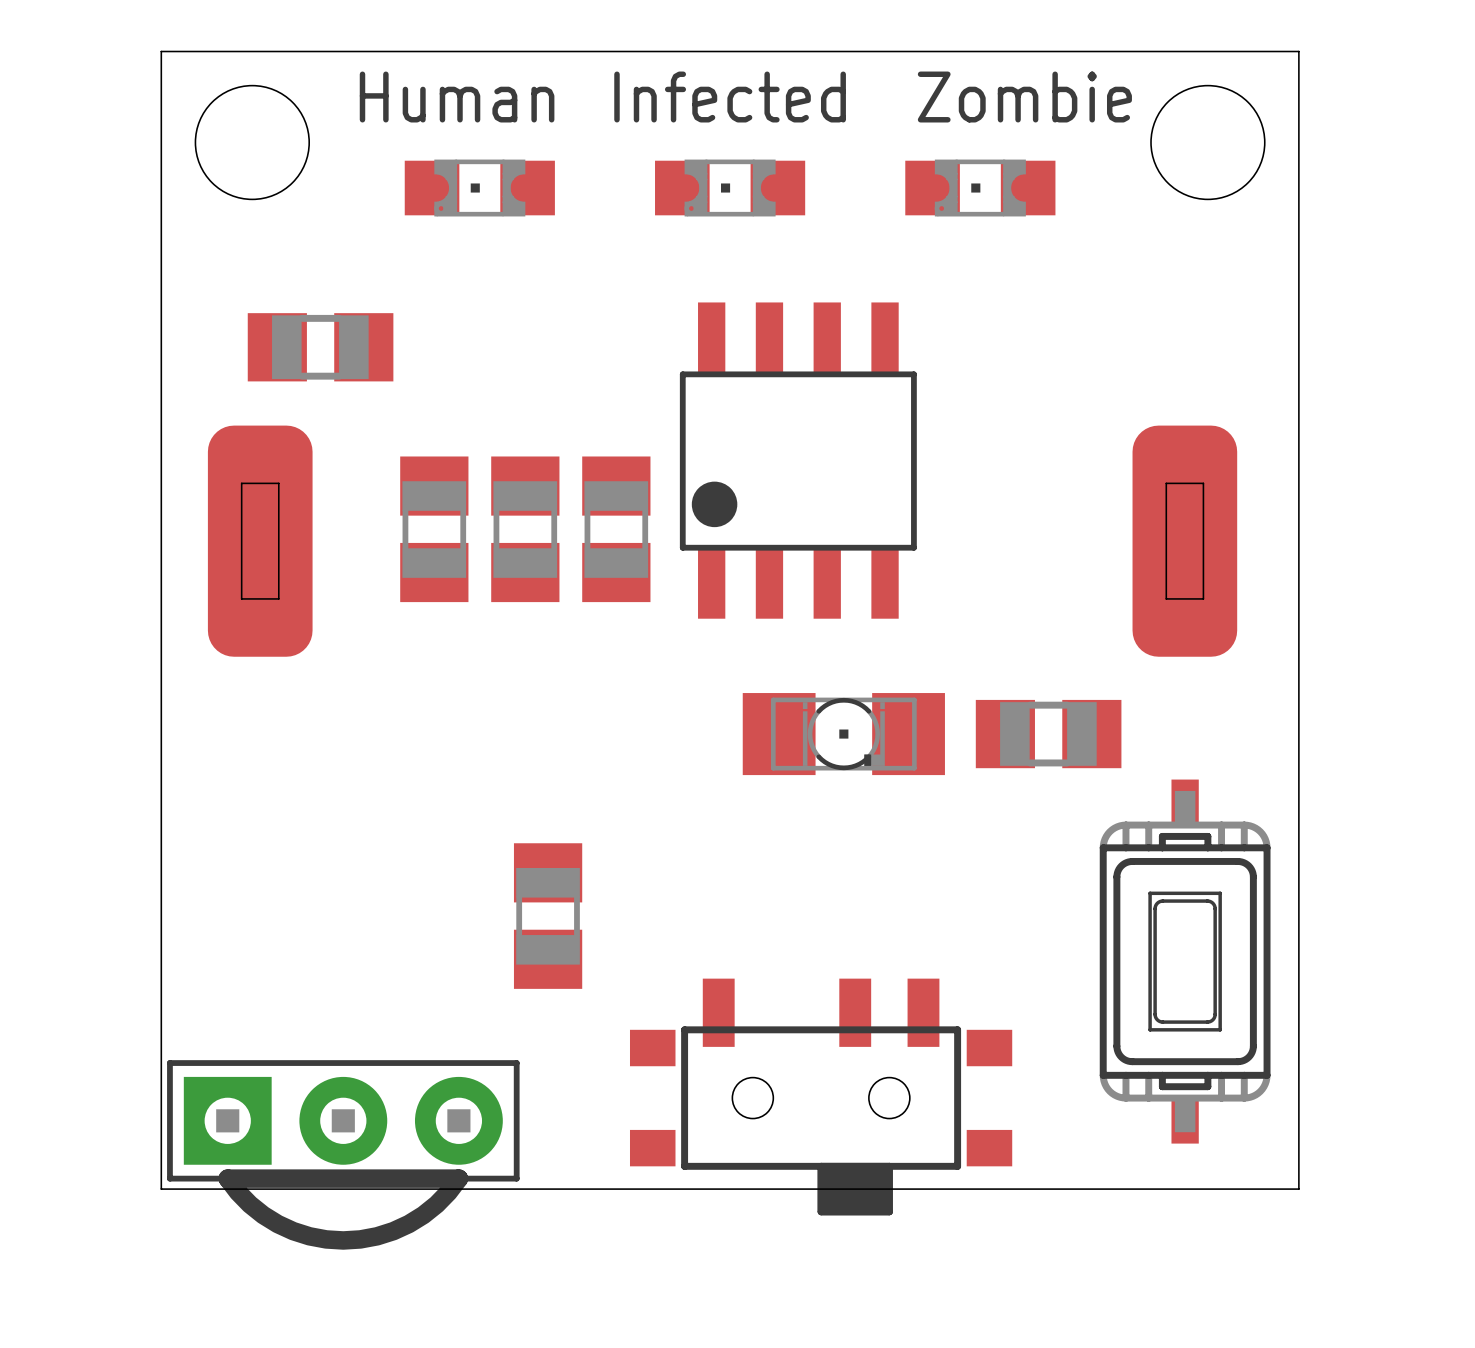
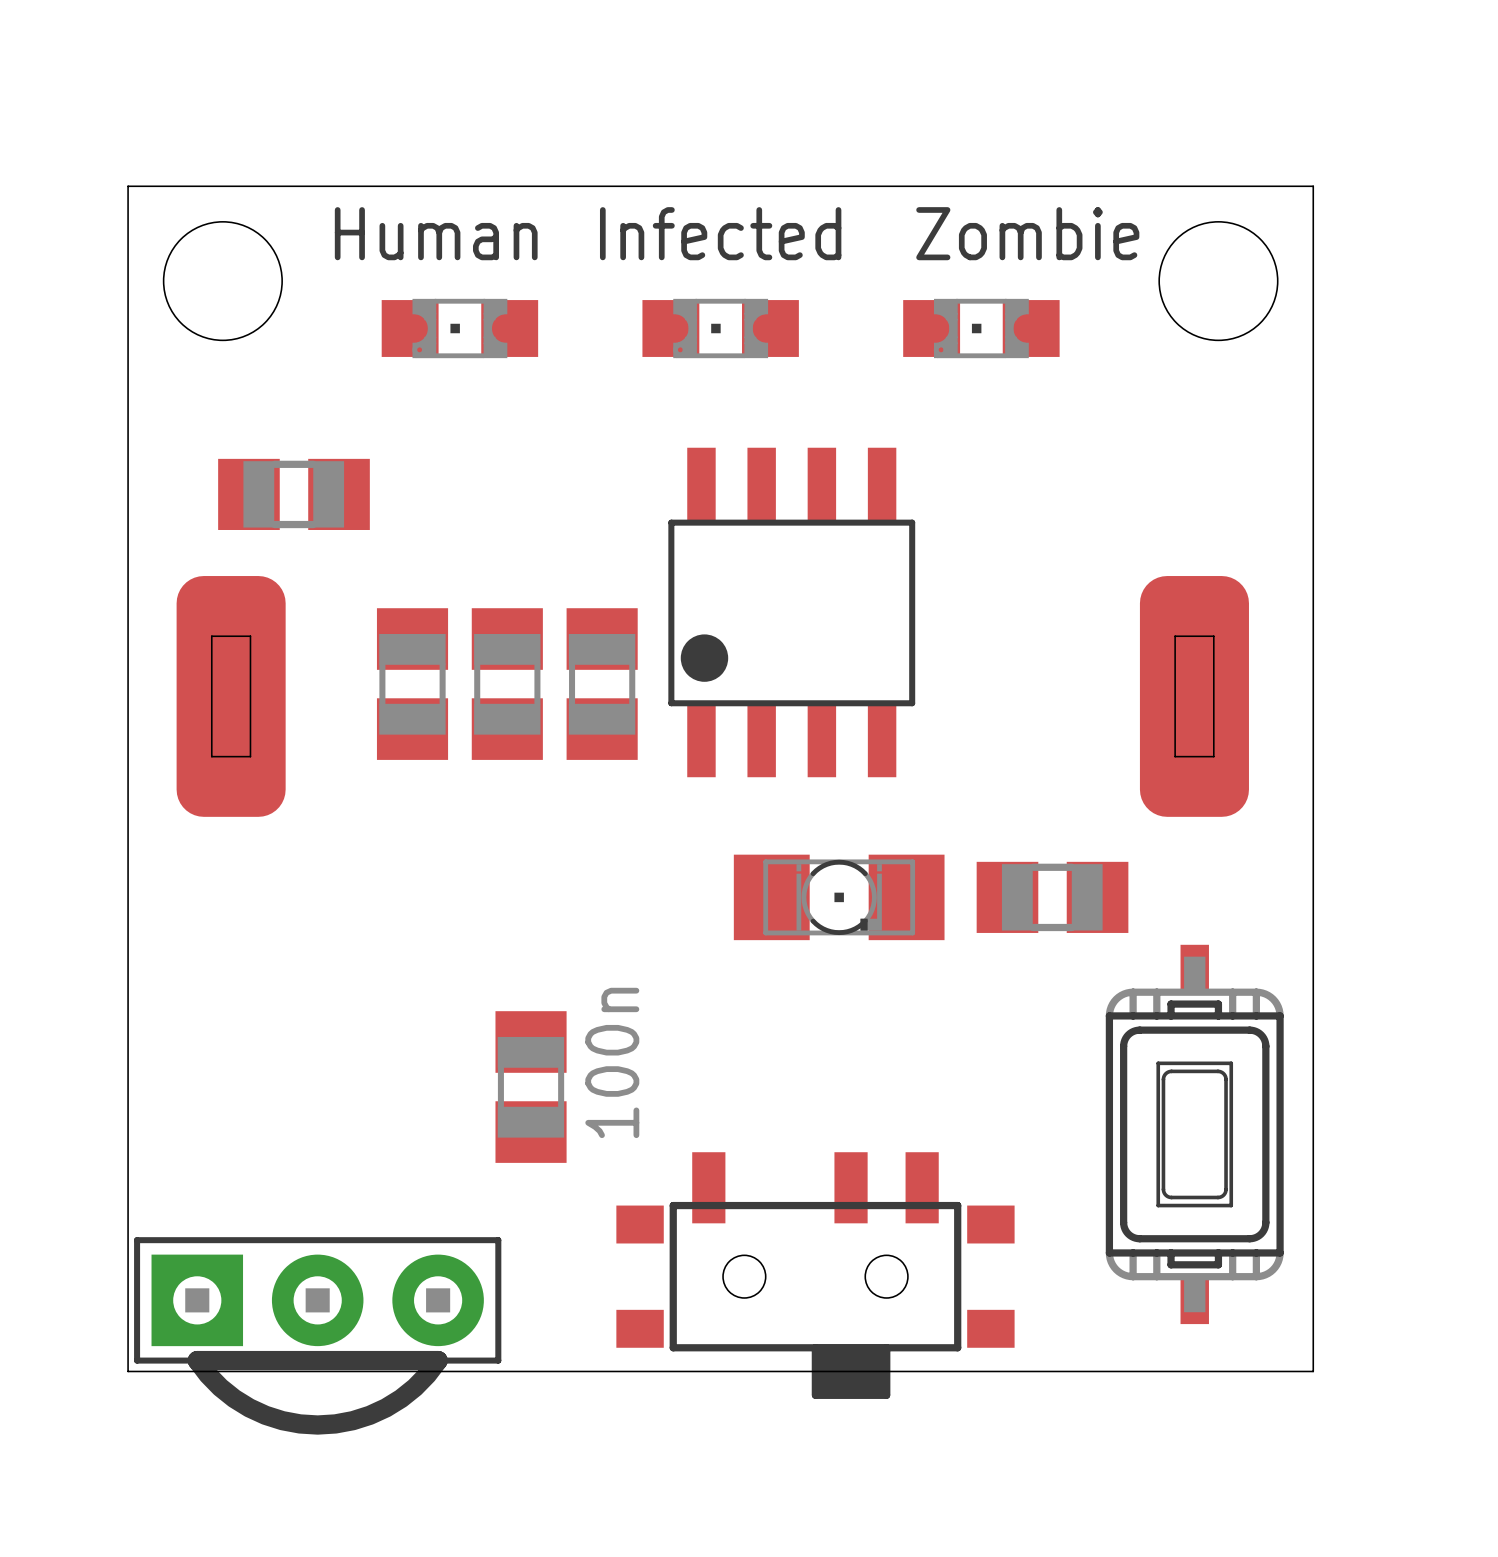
part value: none -> 100n (612, 1062)

